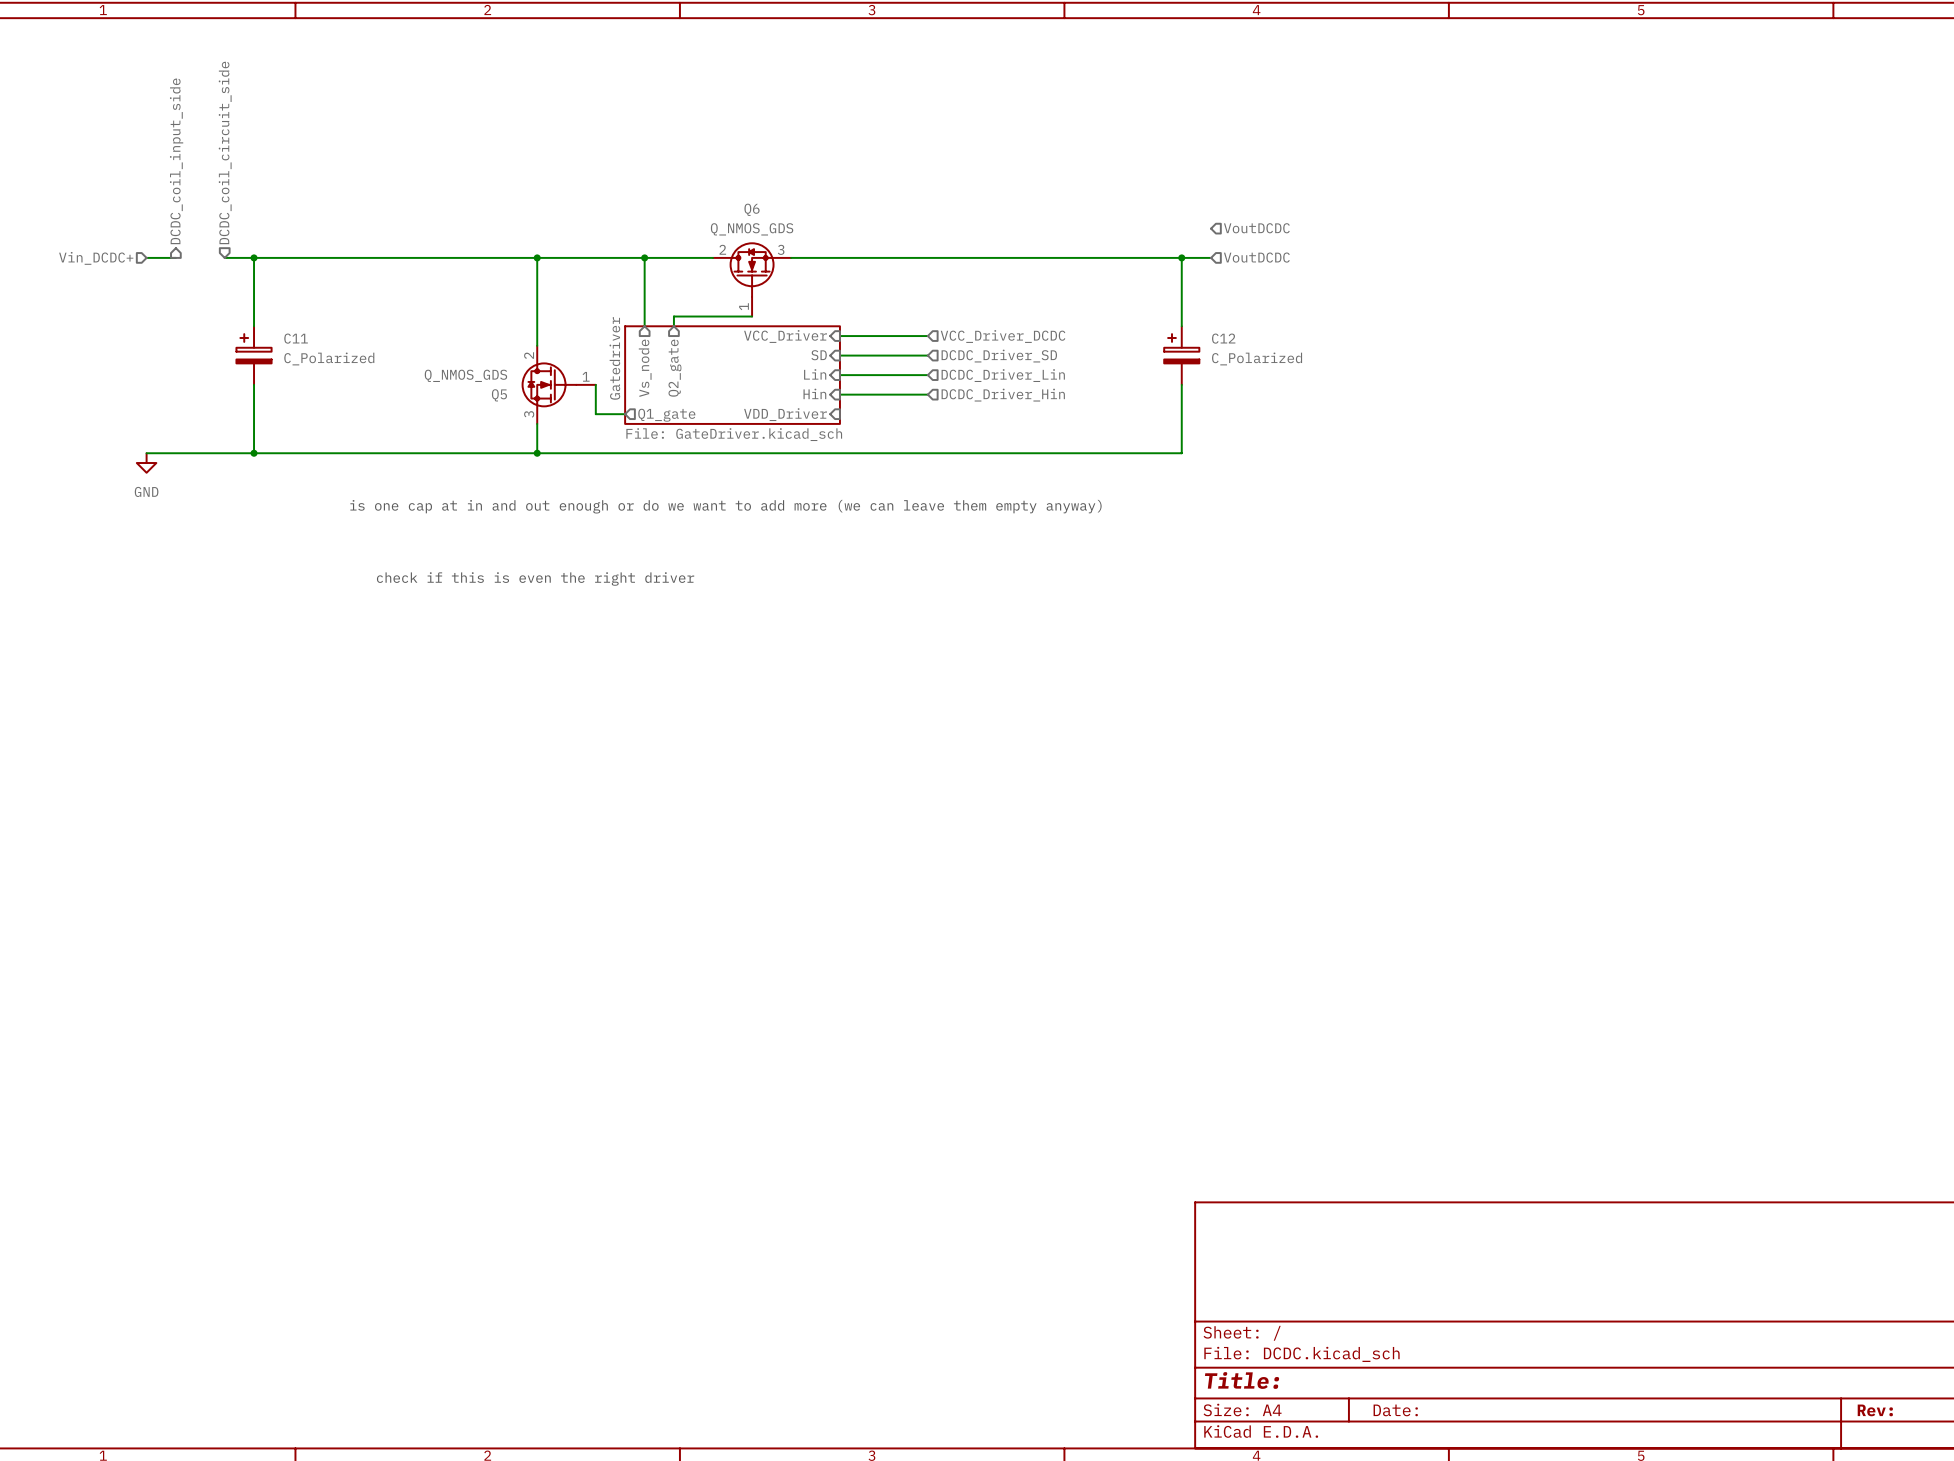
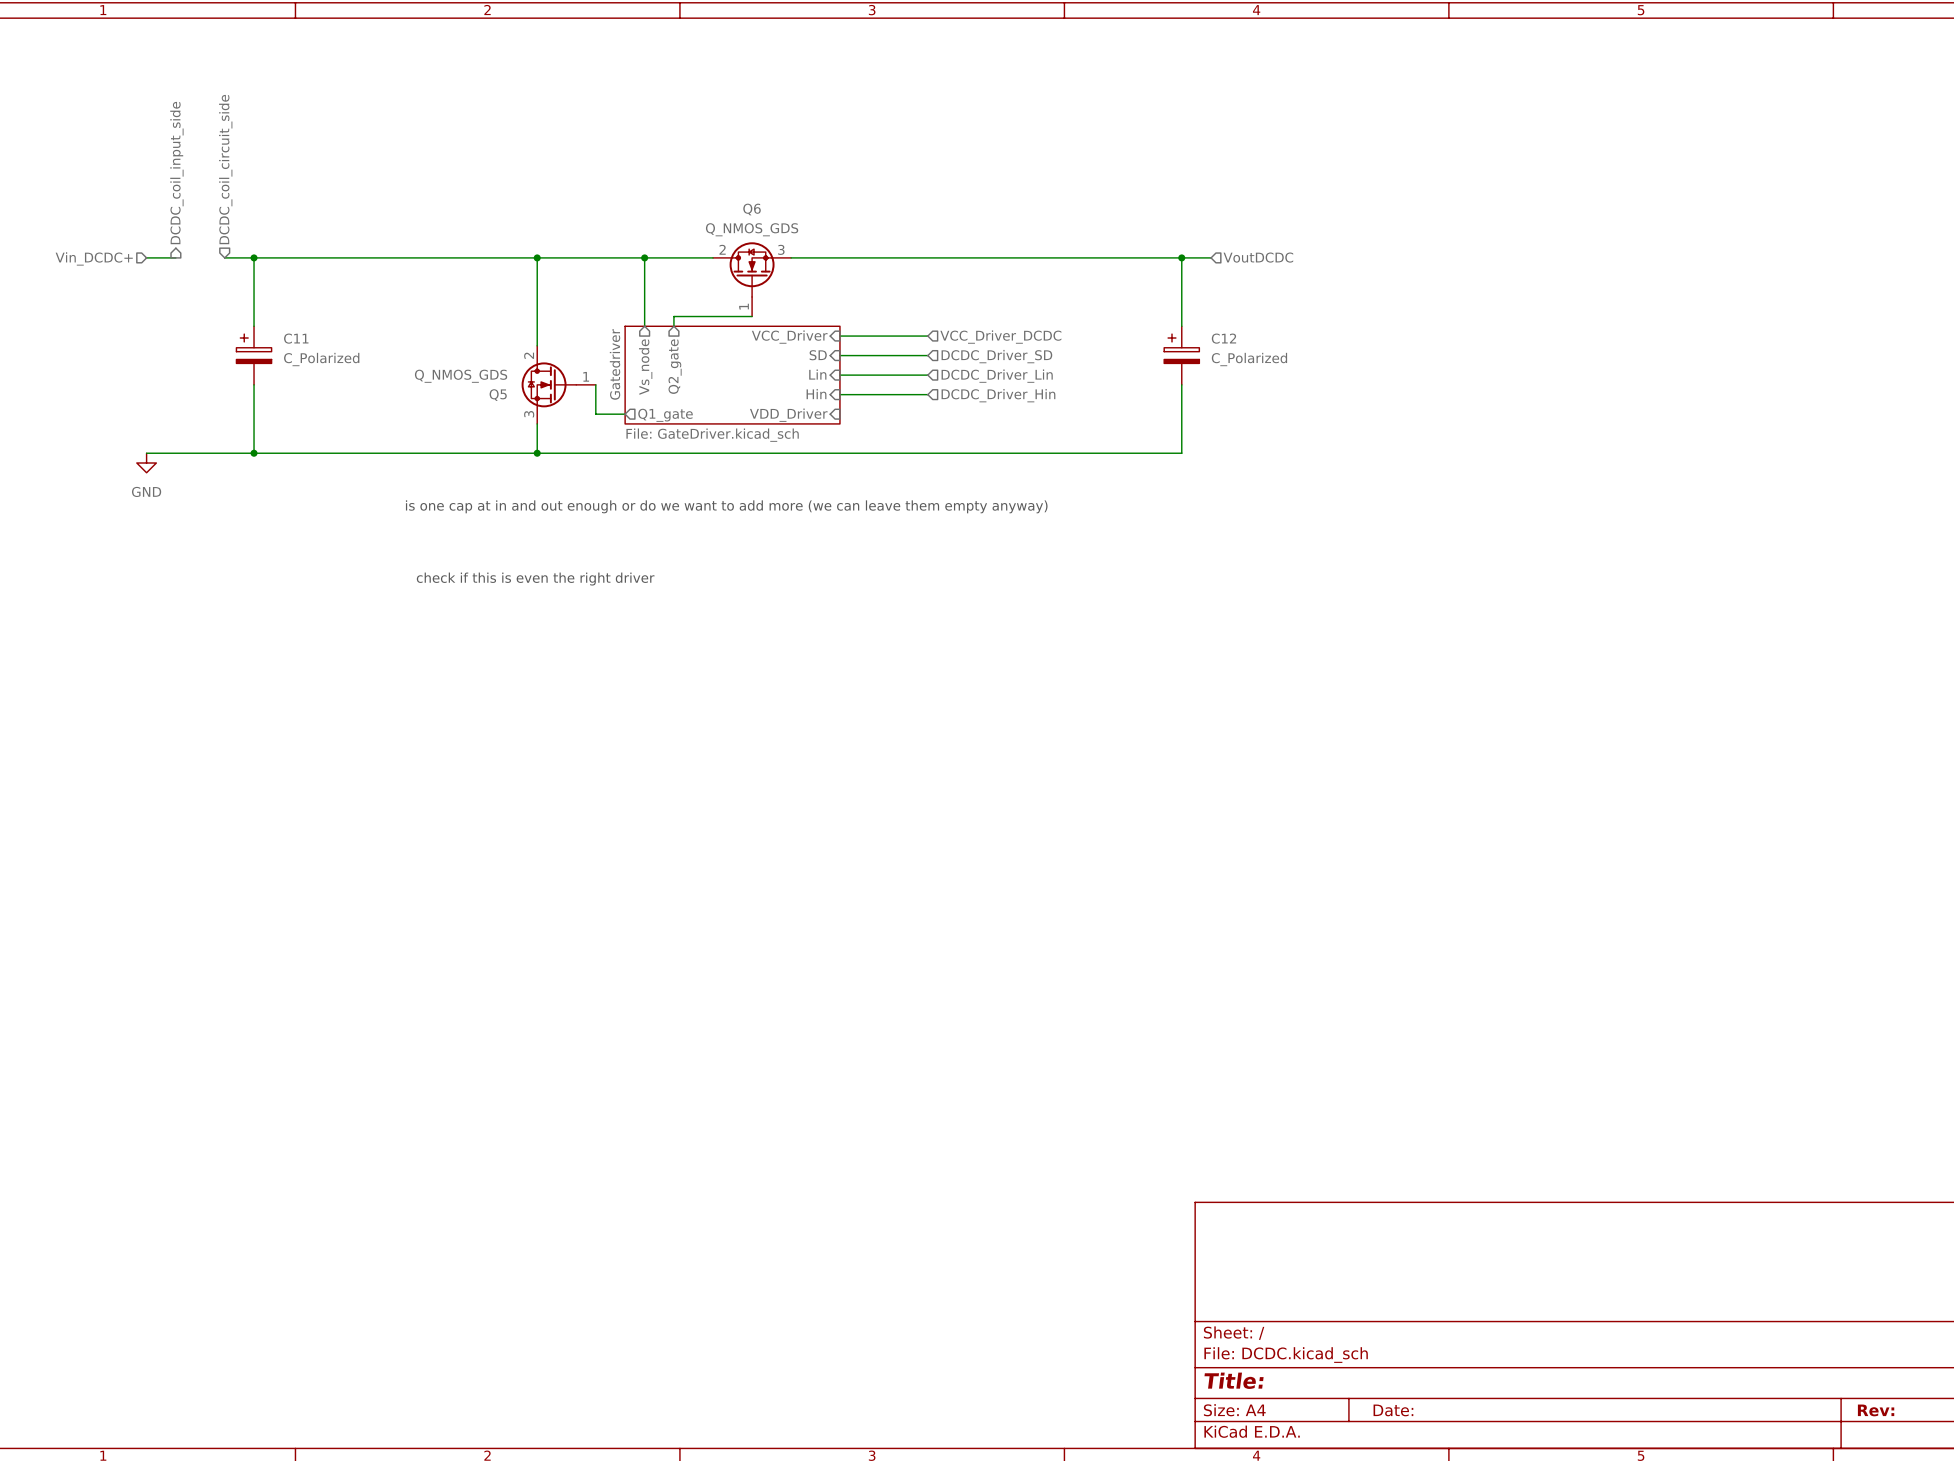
hierarchical label: VoutDCDC (1256, 228) -> none

